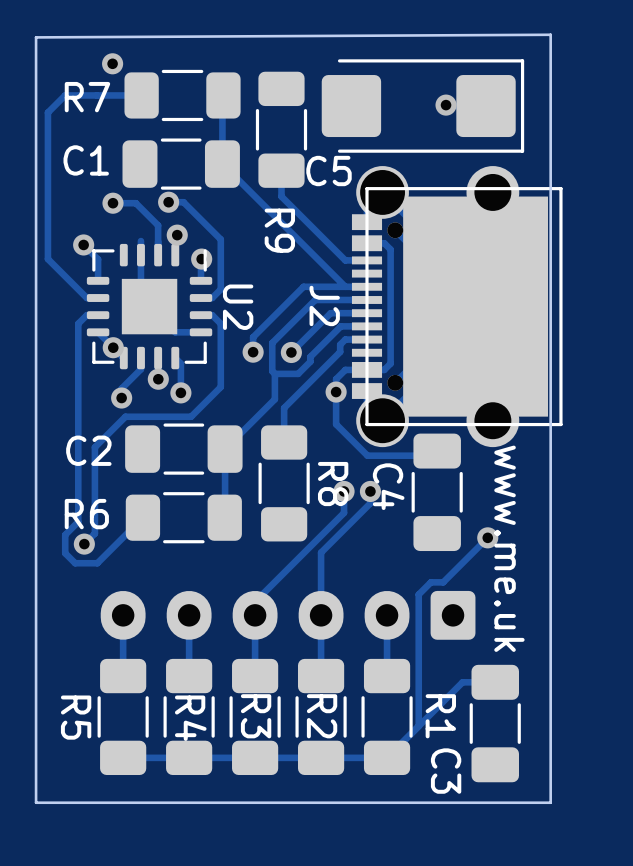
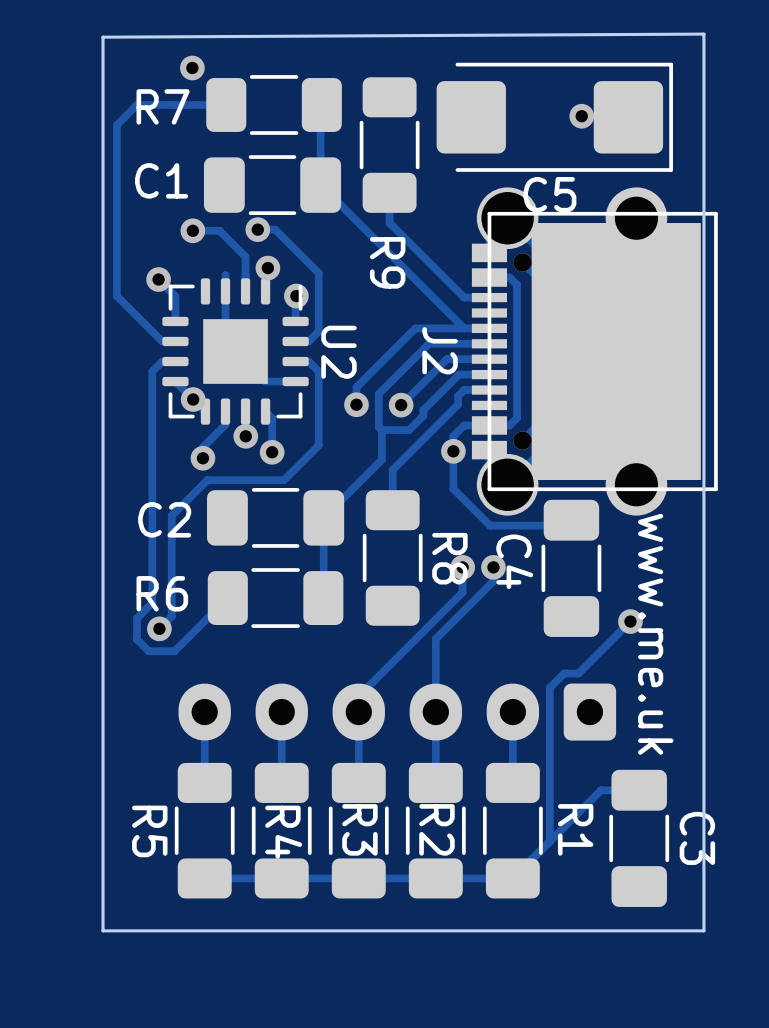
C5 name position: C5 (328, 171) -> C5 (549, 194)
C3 name position: C3 (446, 771) -> C3 (697, 838)

